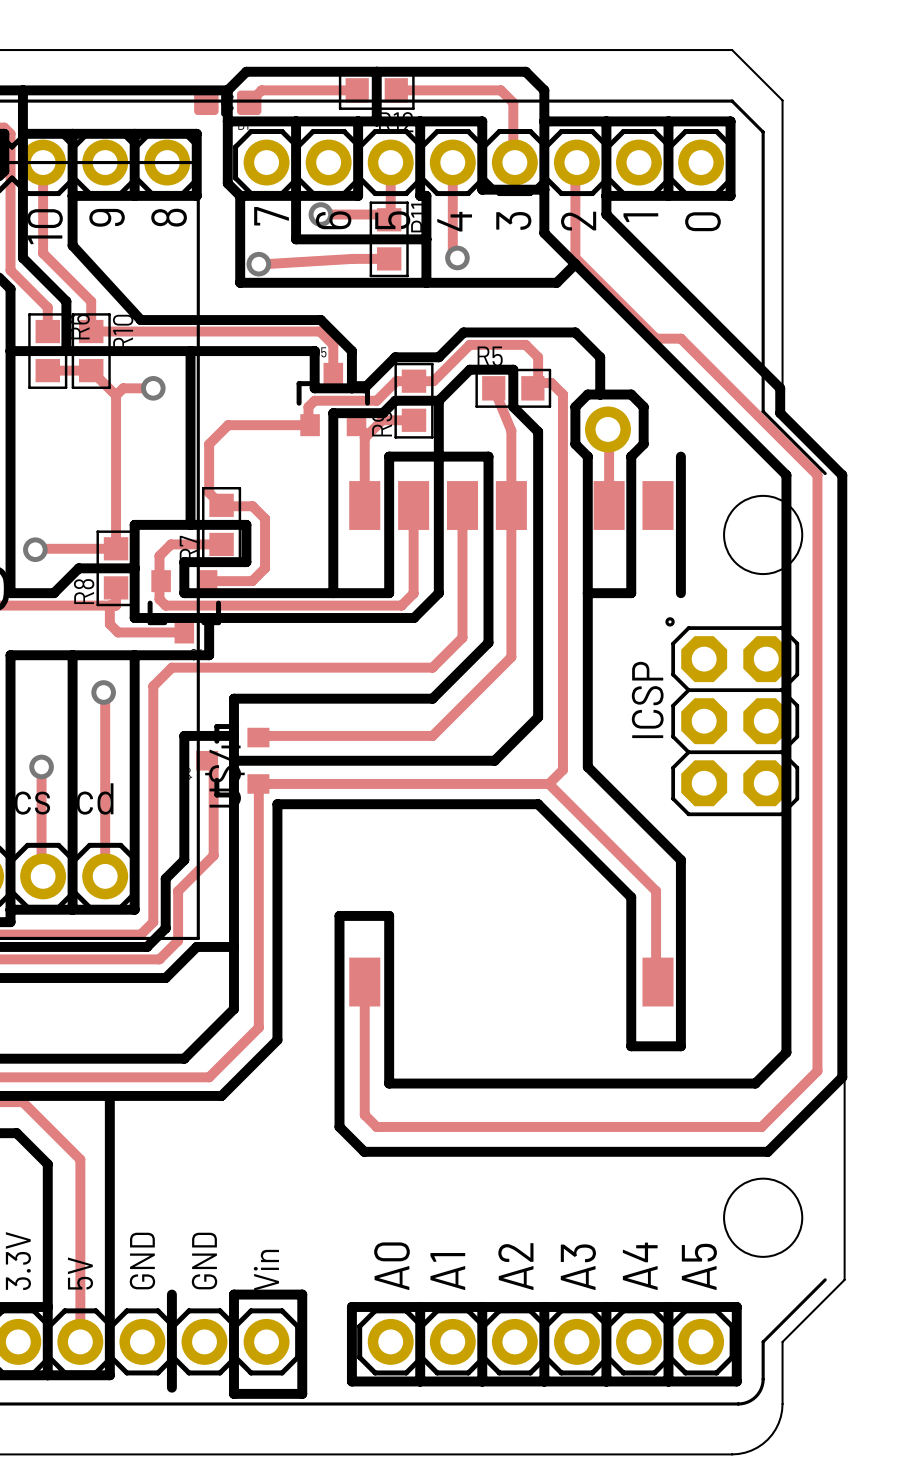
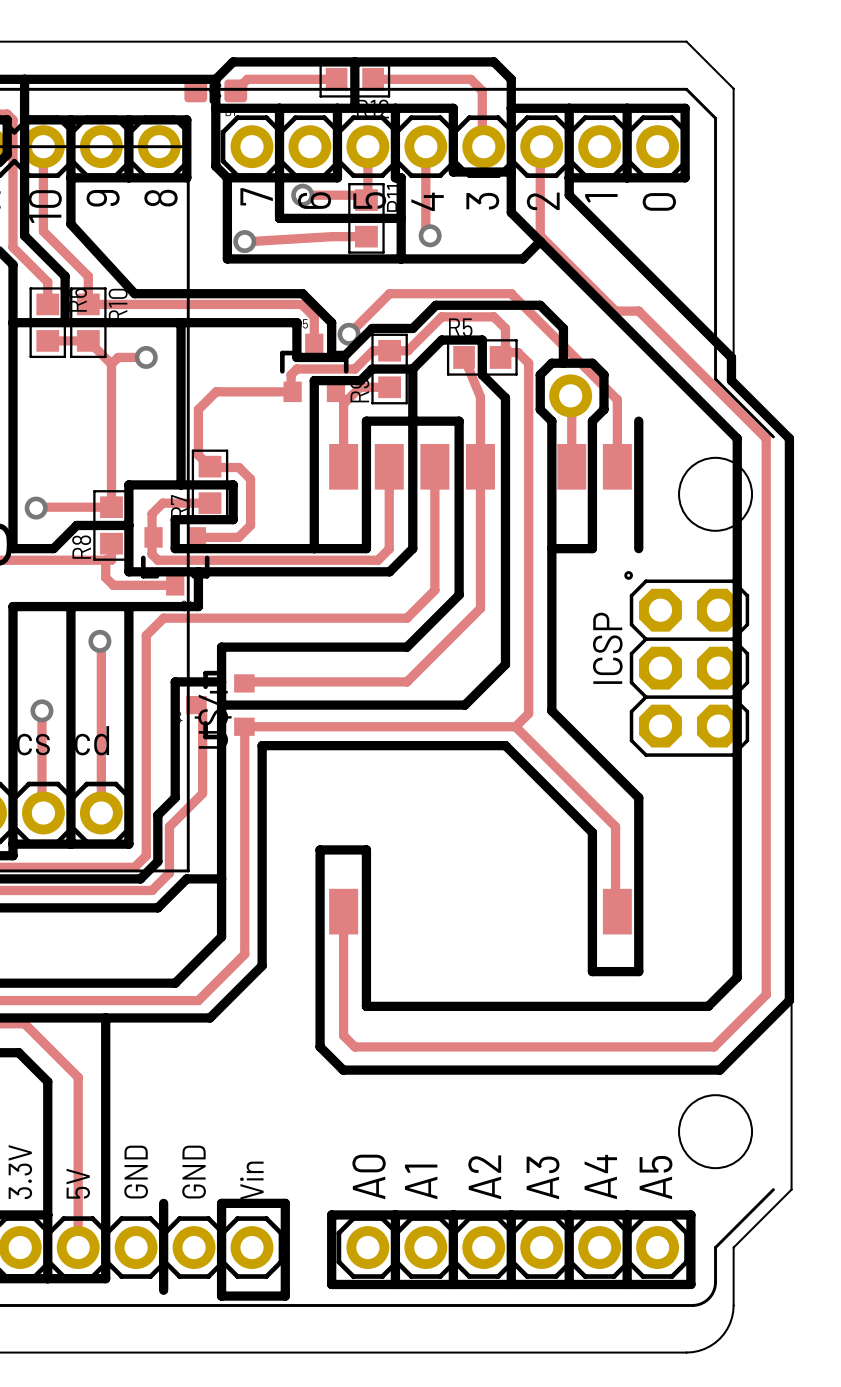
track: none -> (349, 334) (389, 293) (511, 293) (617, 399) (617, 466)
via: none -> (349, 334)

